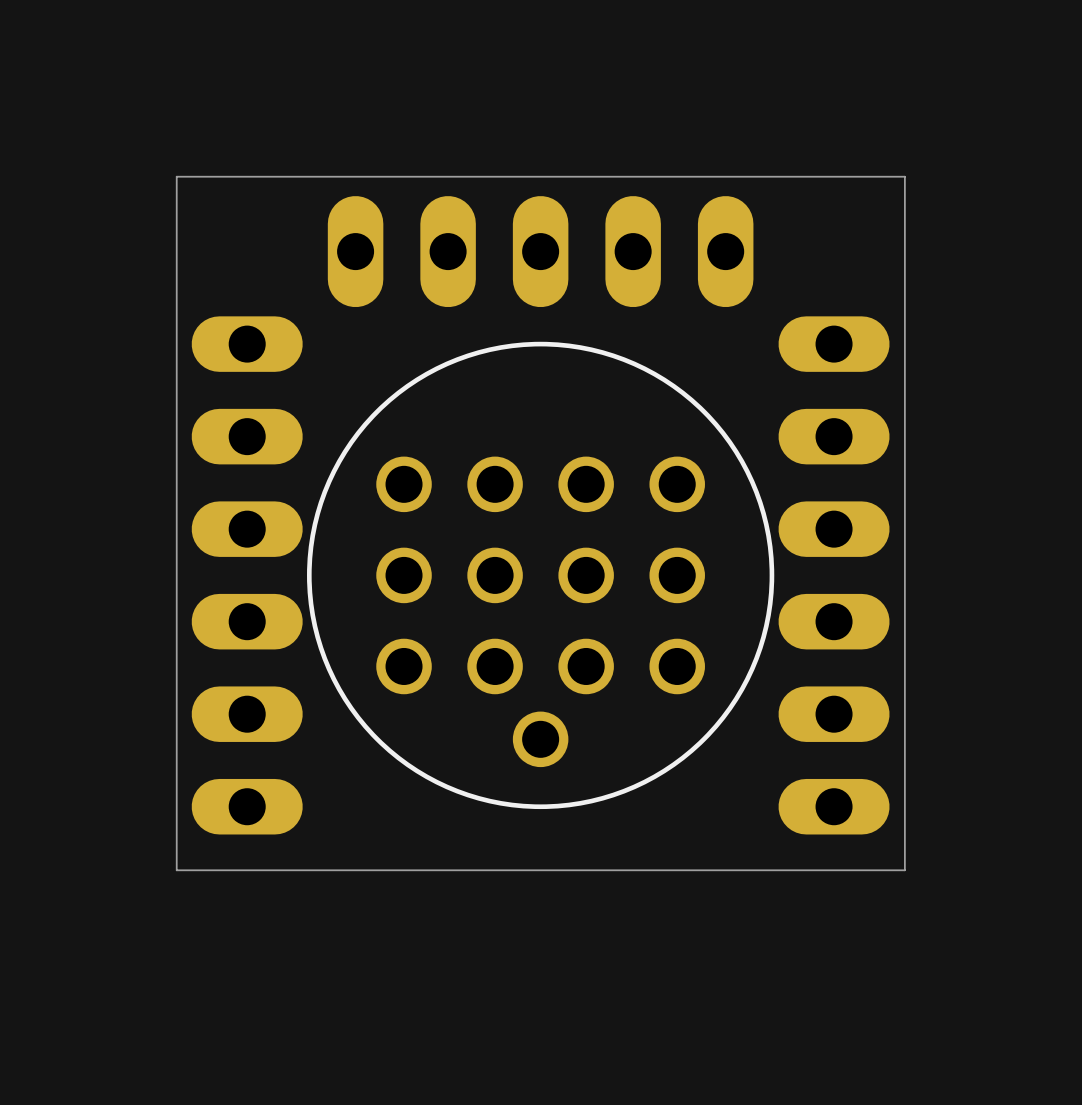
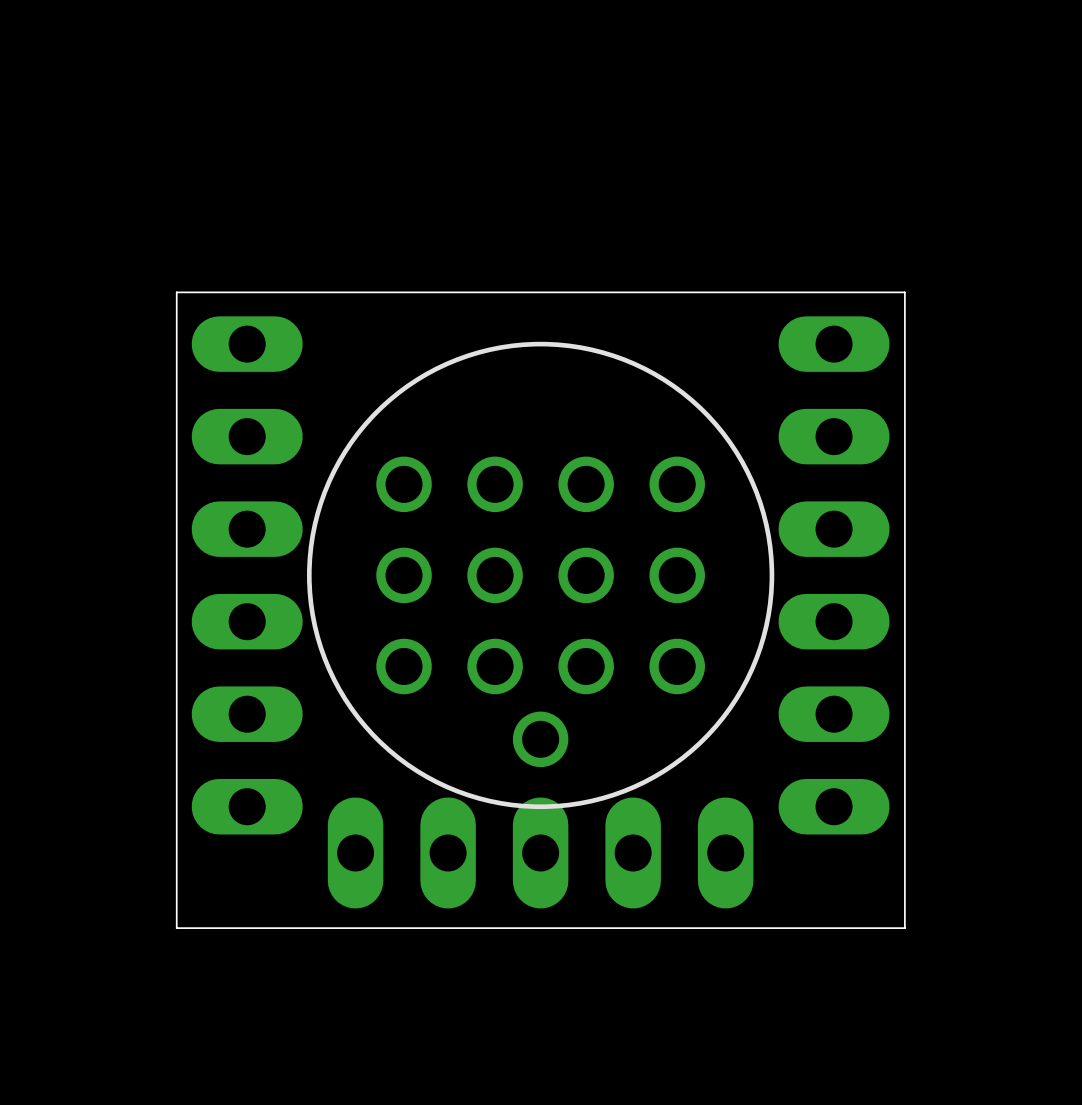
part position: (540, 251) -> (540, 852)
board edge: (904, 292) (904, 176) (176, 176) (176, 292) -> (904, 292) (176, 292)
board edge: (904, 870) (176, 870) -> (904, 870) (904, 928) (176, 928) (176, 870)

